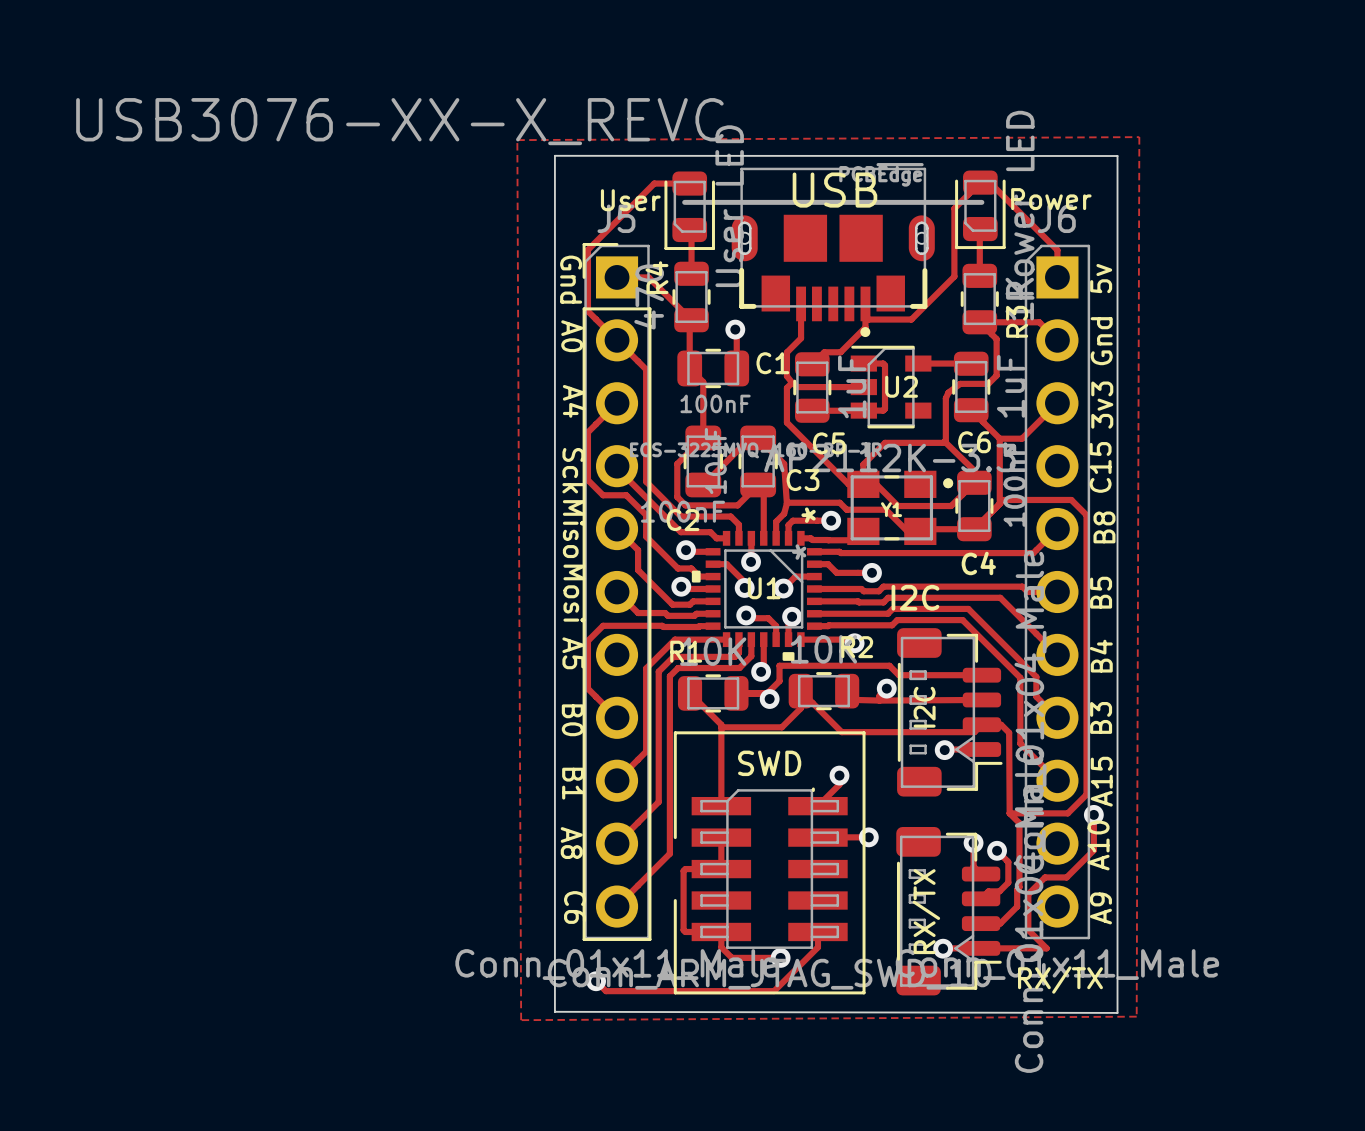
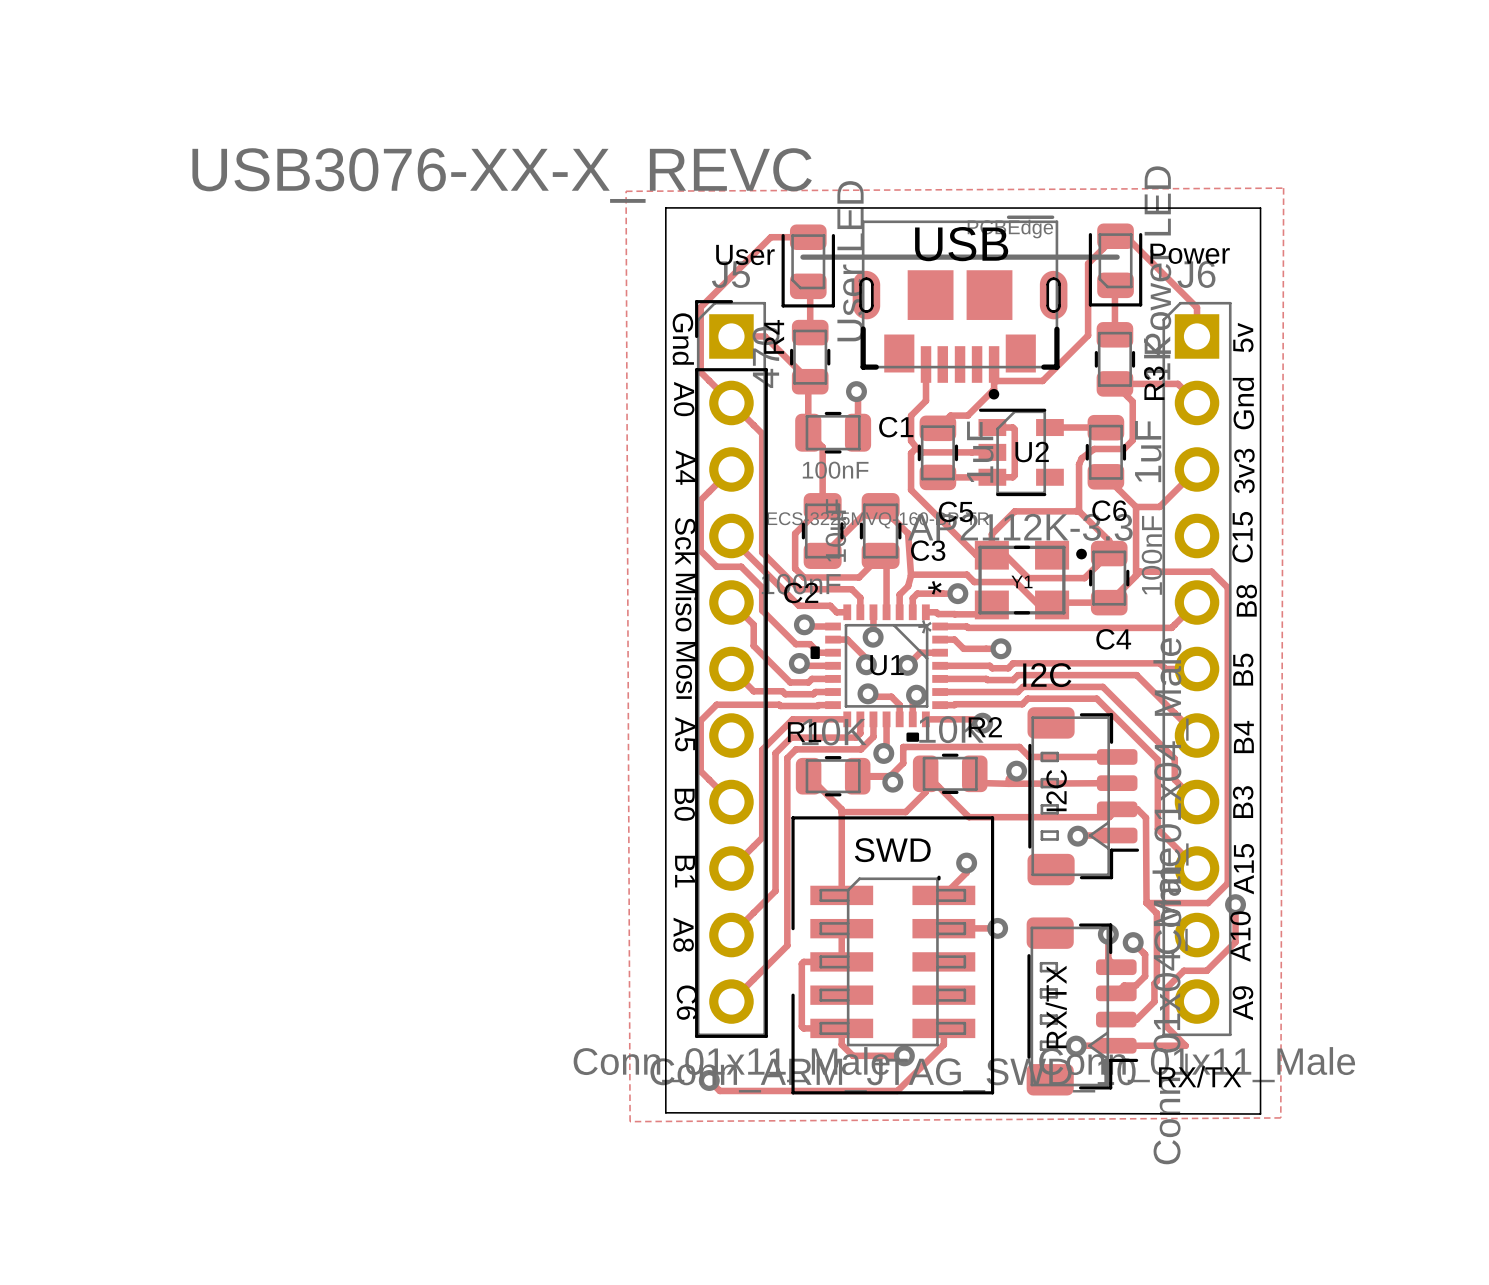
USB footprint: [682, 167, 985, 338] -> [800, 220, 1120, 400]

